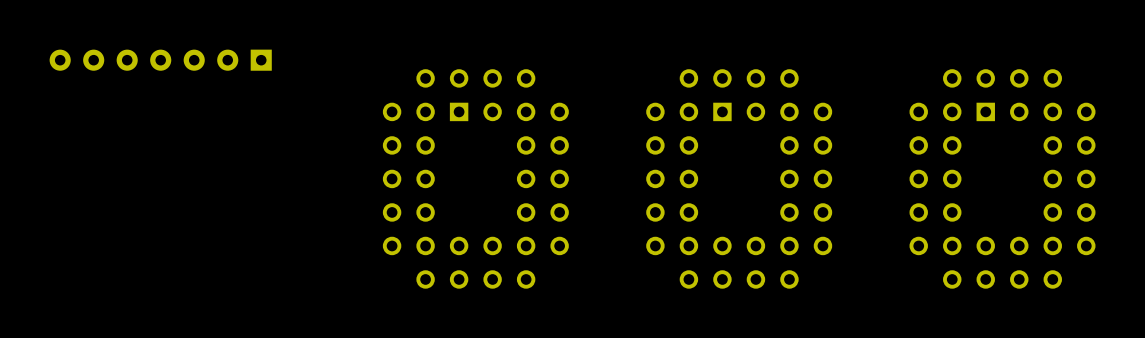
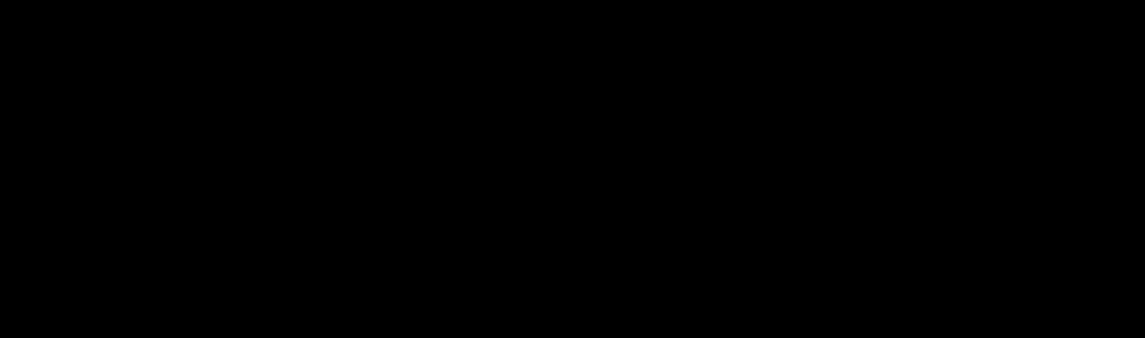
part: (160, 60) -> none
part: (475, 178) -> none
part: (739, 178) -> none
part: (1002, 178) -> none

